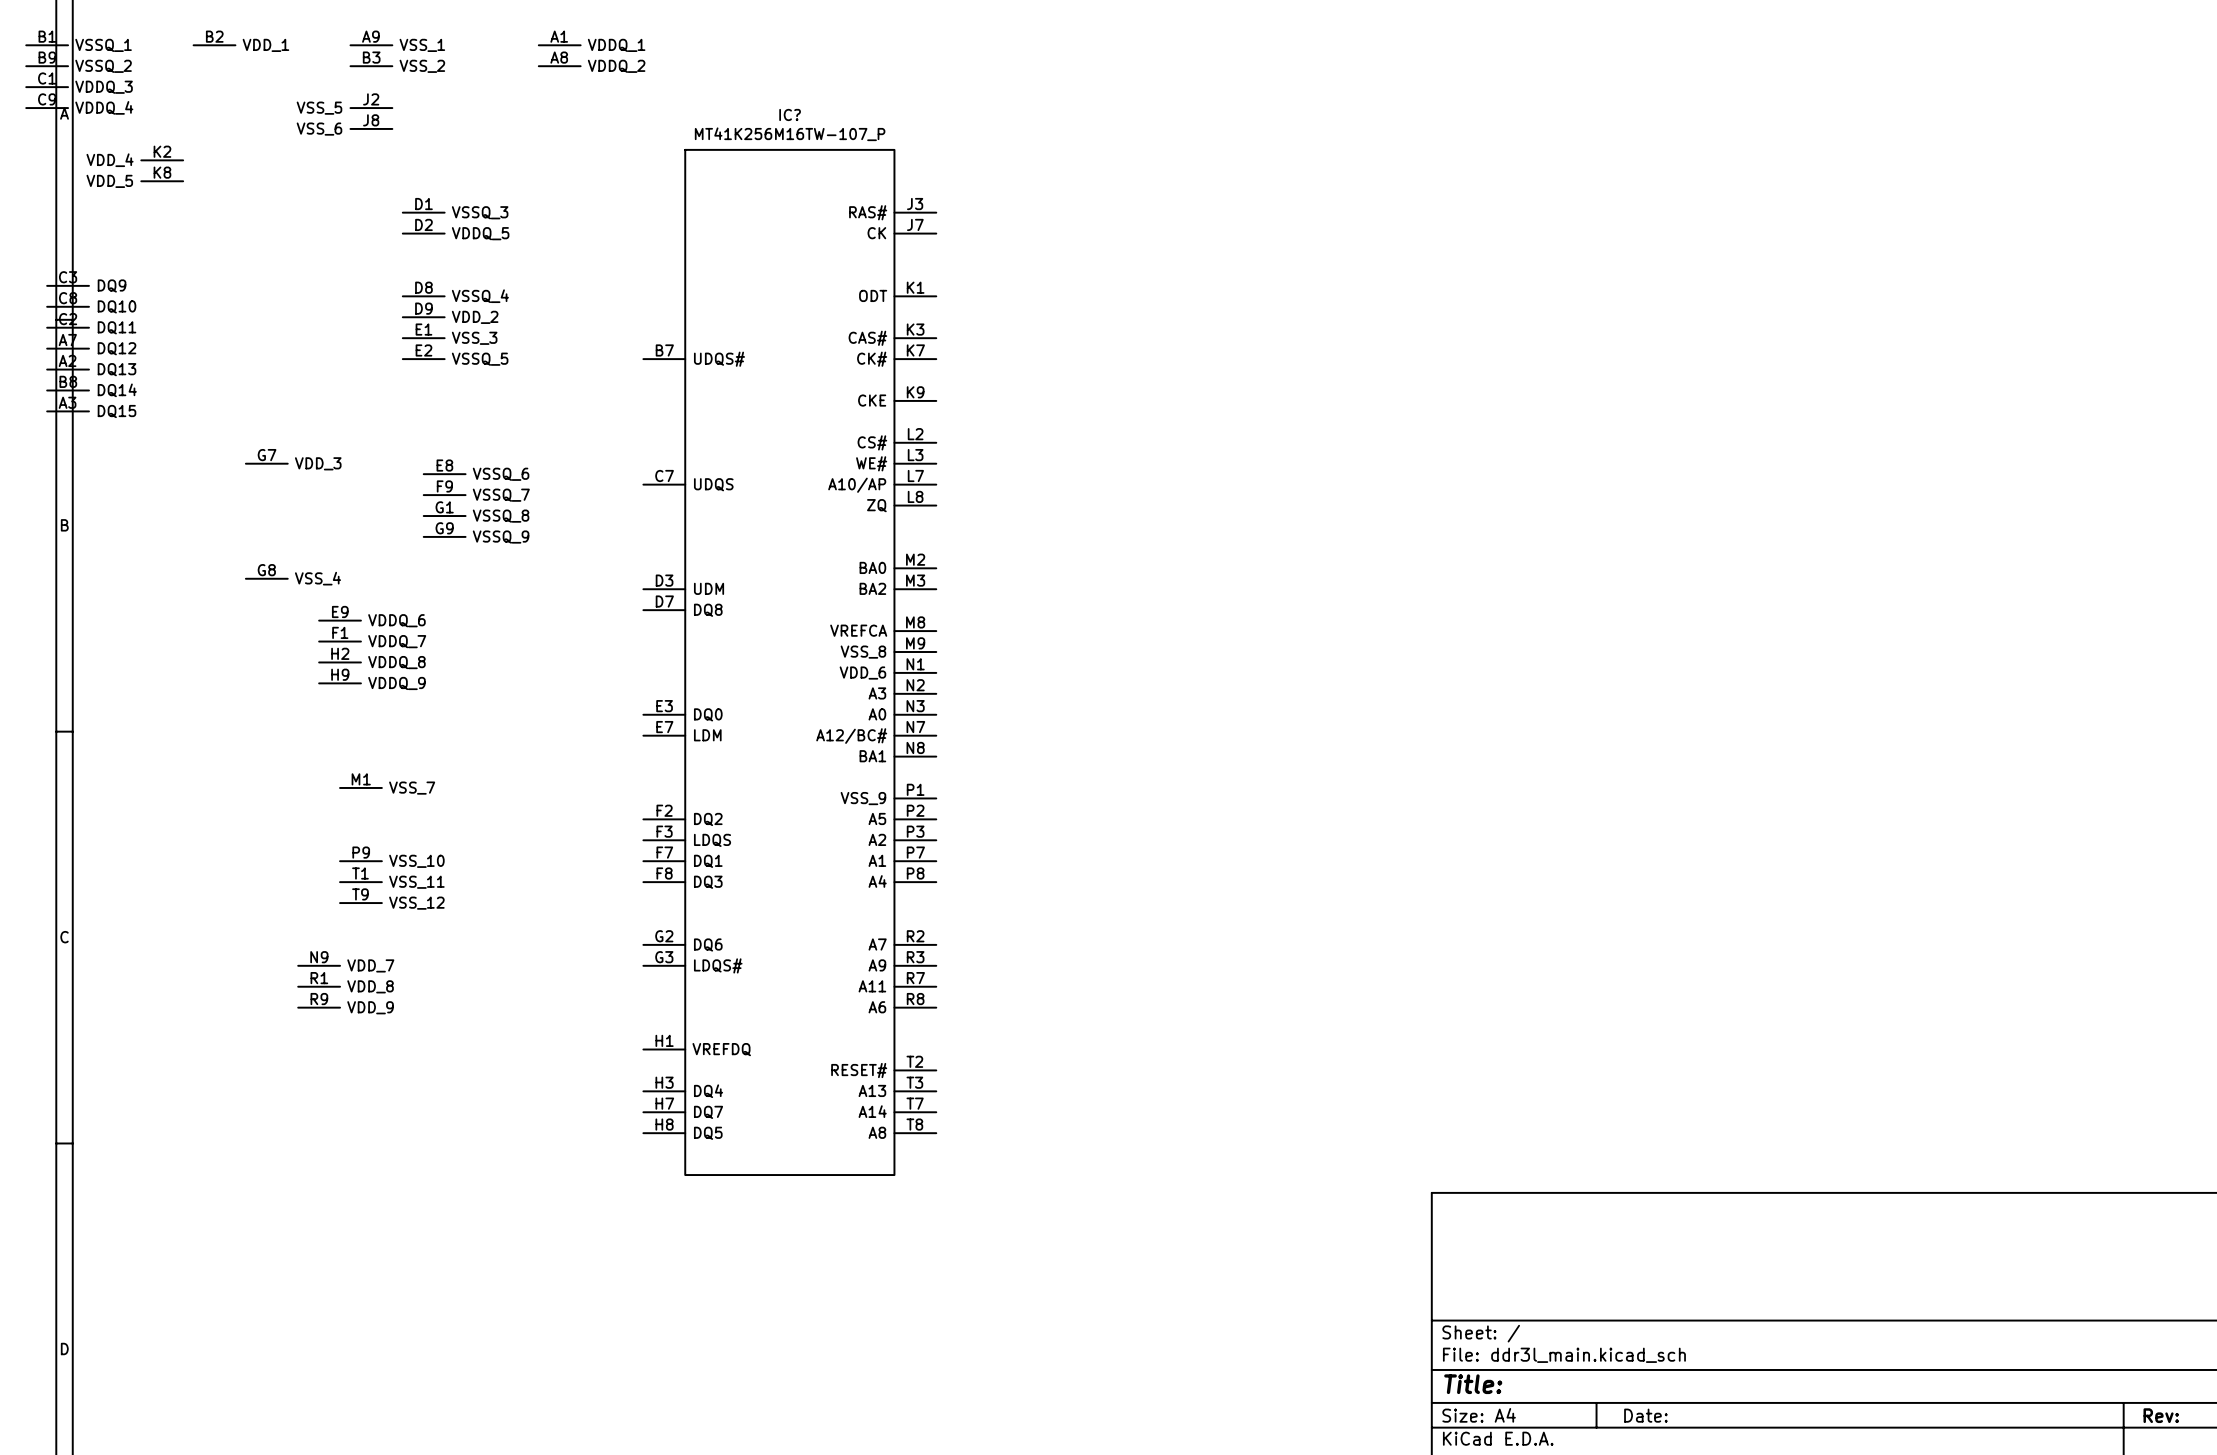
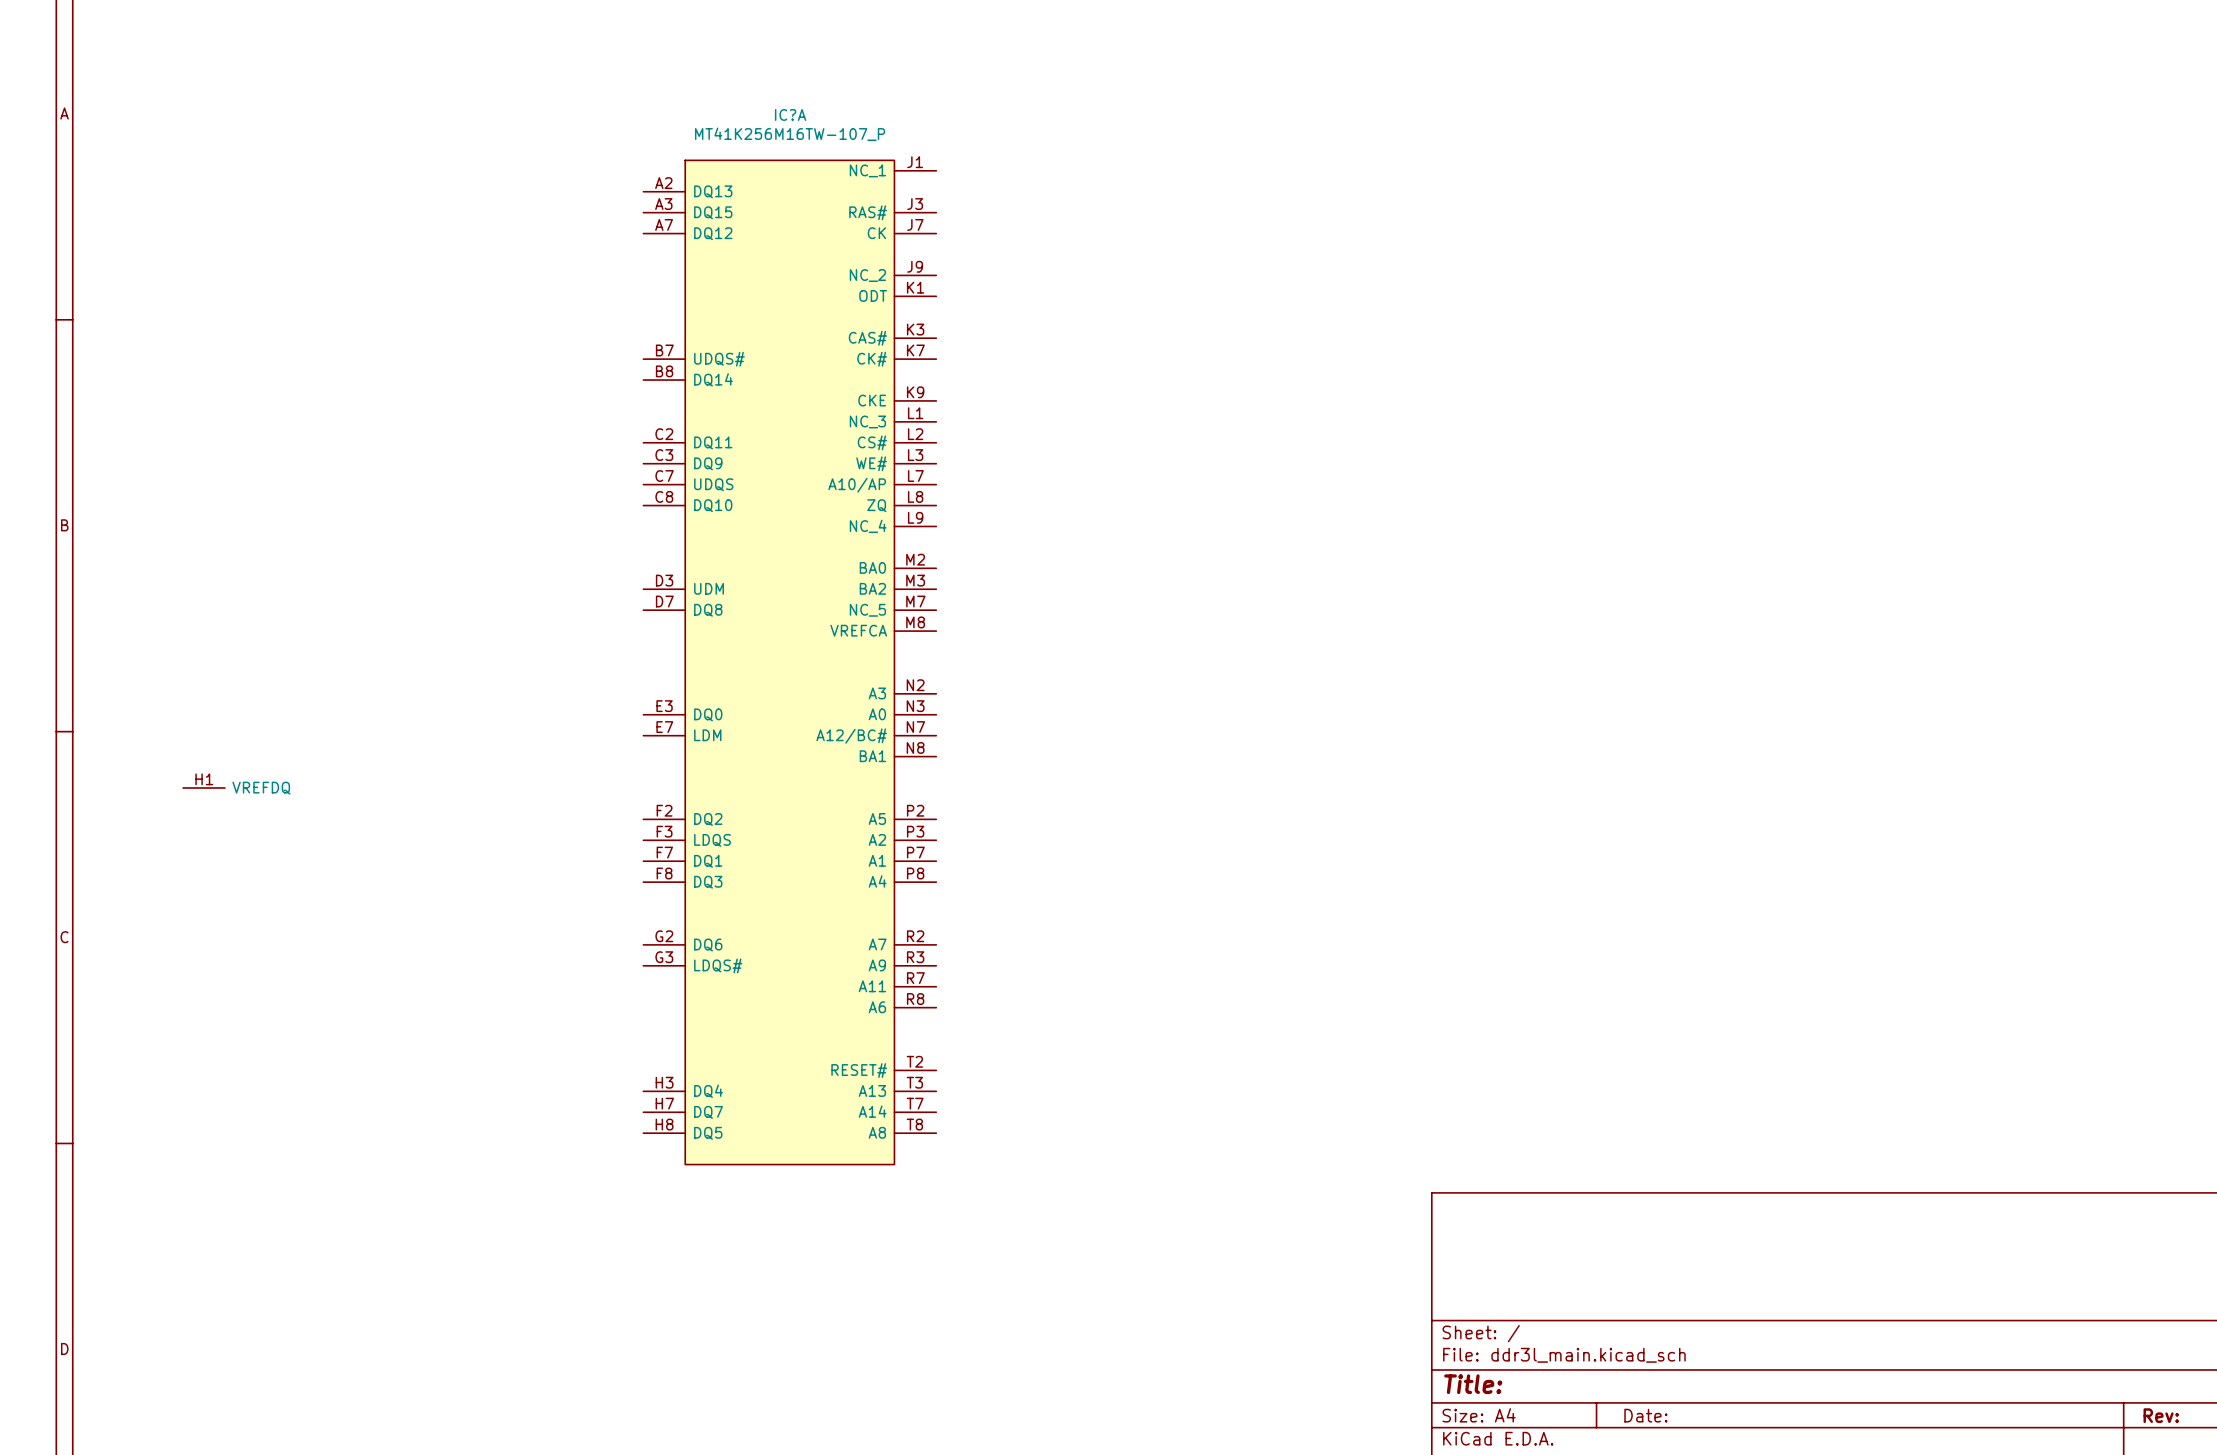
IC?: MT41K256M16TW-107_P (481, 610) -> none
IC?A: none -> MT41K256M16TW-107_P (559, 662)

